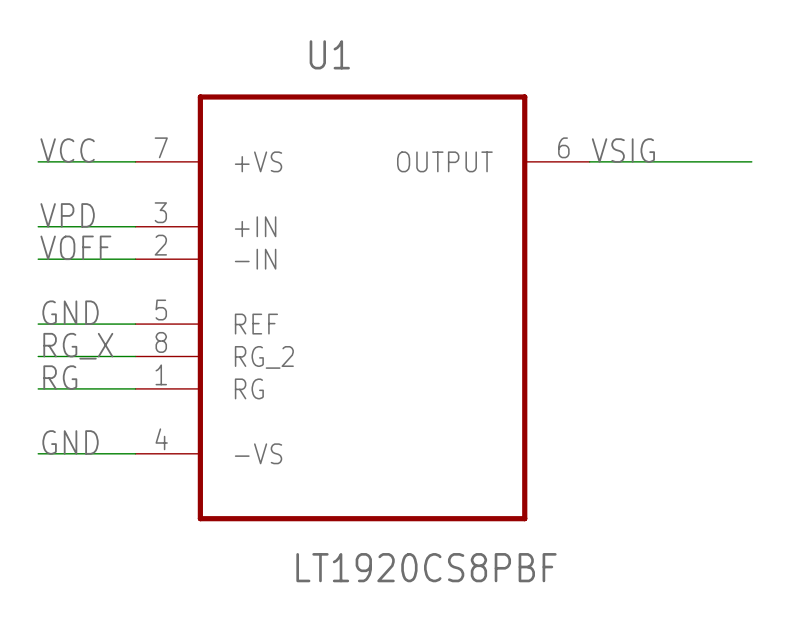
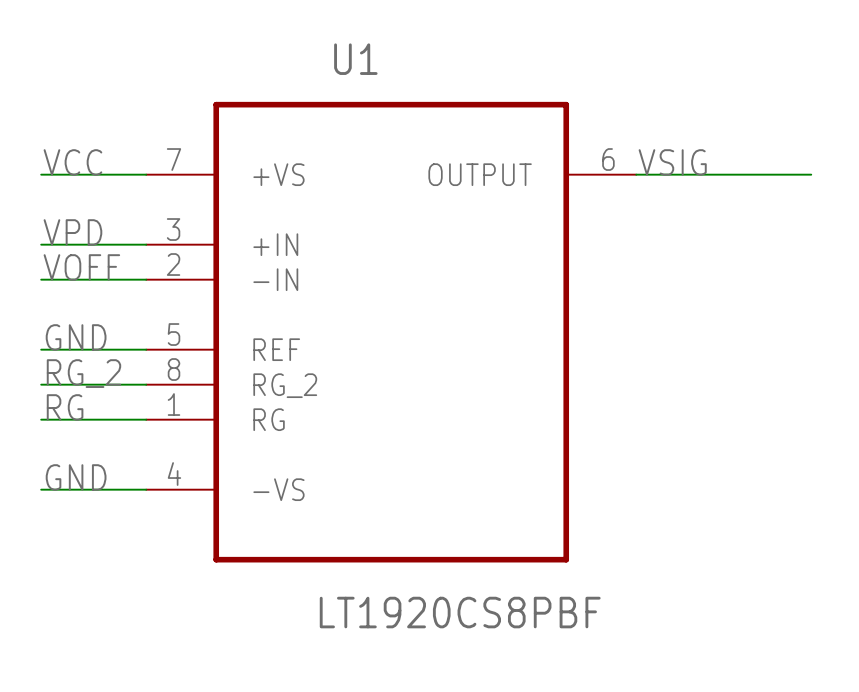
label: RG_X (78, 346) -> RG_2 (83, 373)

